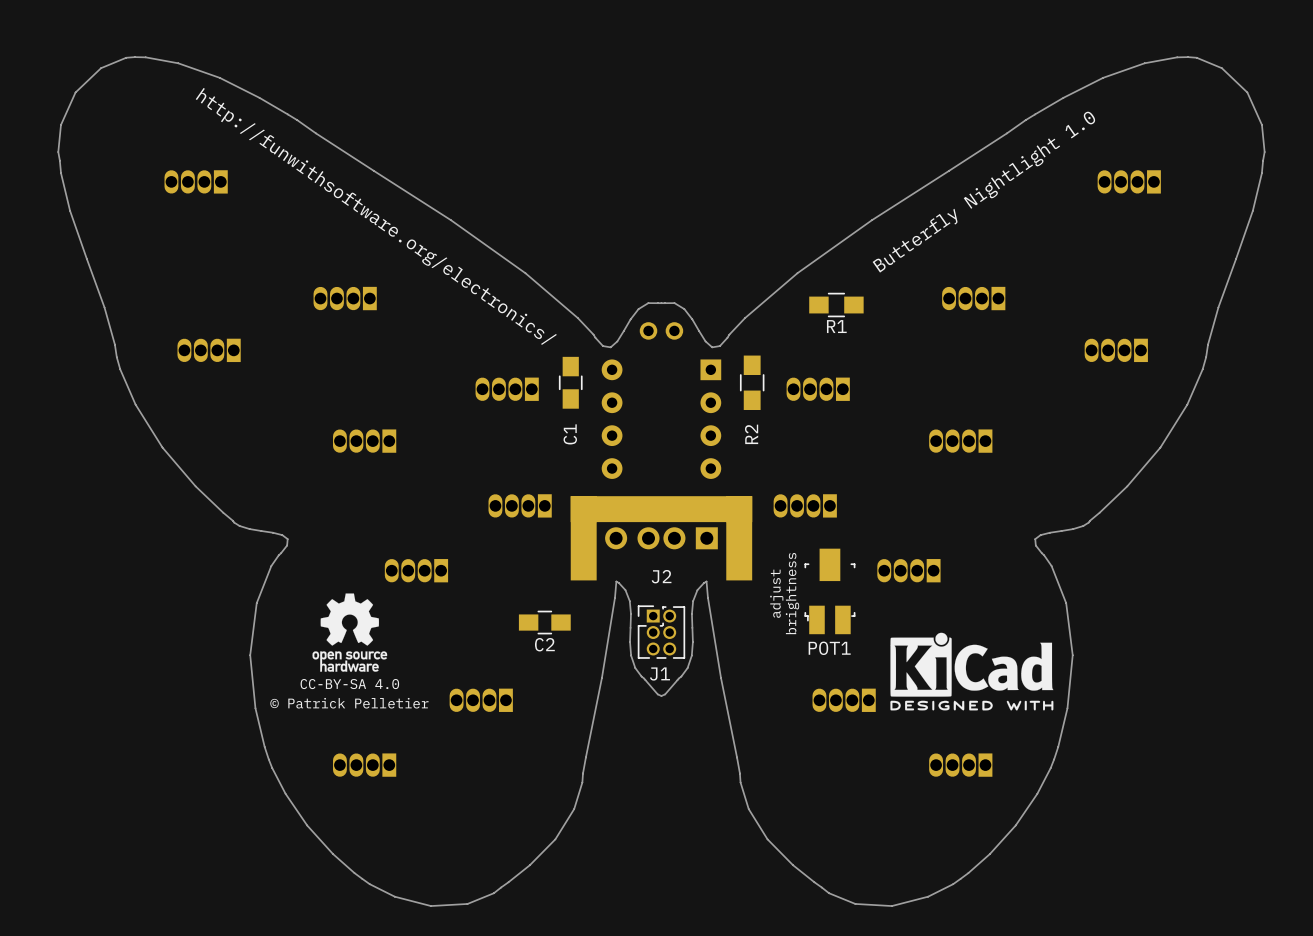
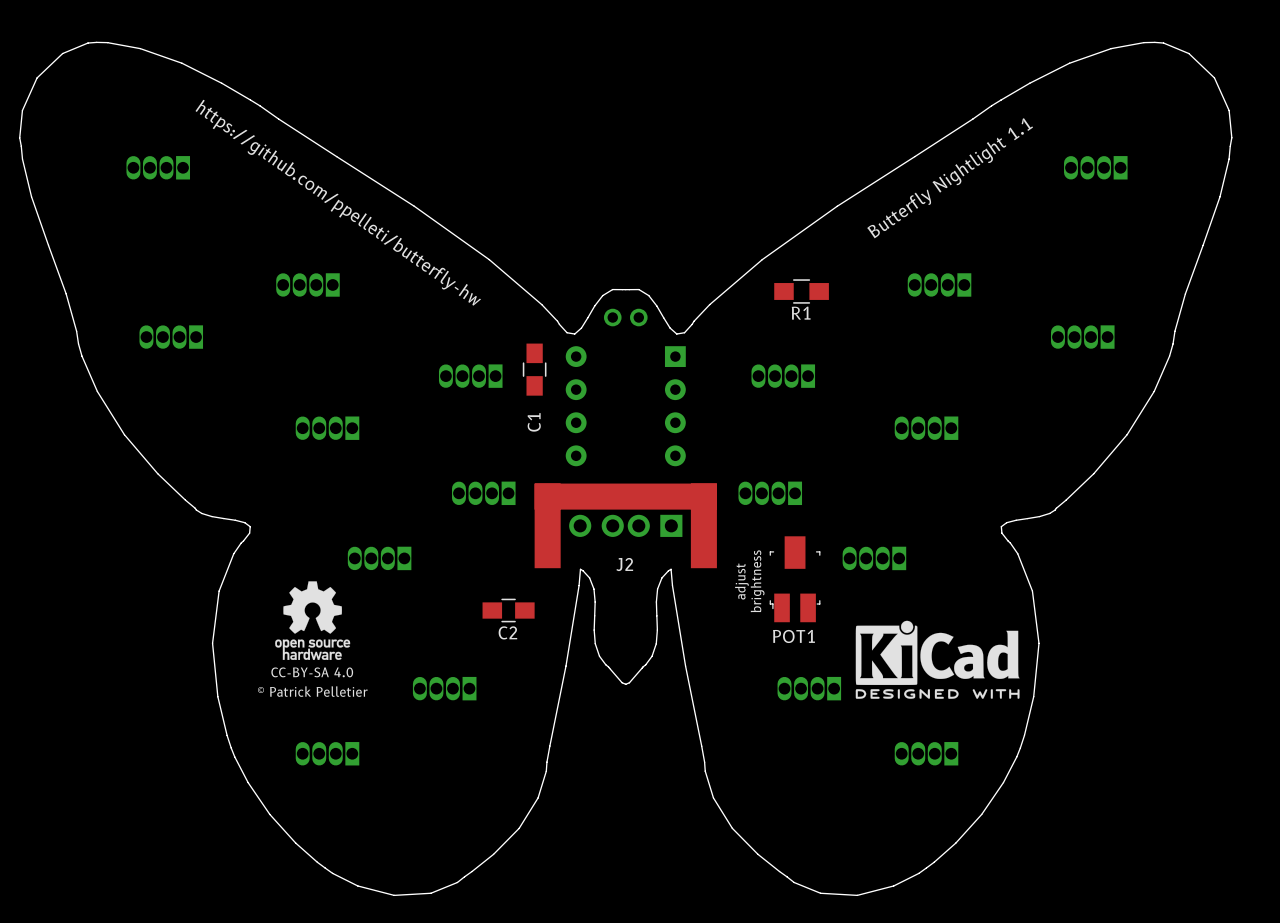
text: Butterfly Nightlight 1.0 (983, 192) -> Butterfly Nightlight 1.1 (950, 178)
text: http://funwithsoftware.org/electronics/ (376, 216) -> https://github.com/ppelleti/butterfly-hw (338, 202)
R2: (752, 382) -> none
J1: (661, 632) -> none

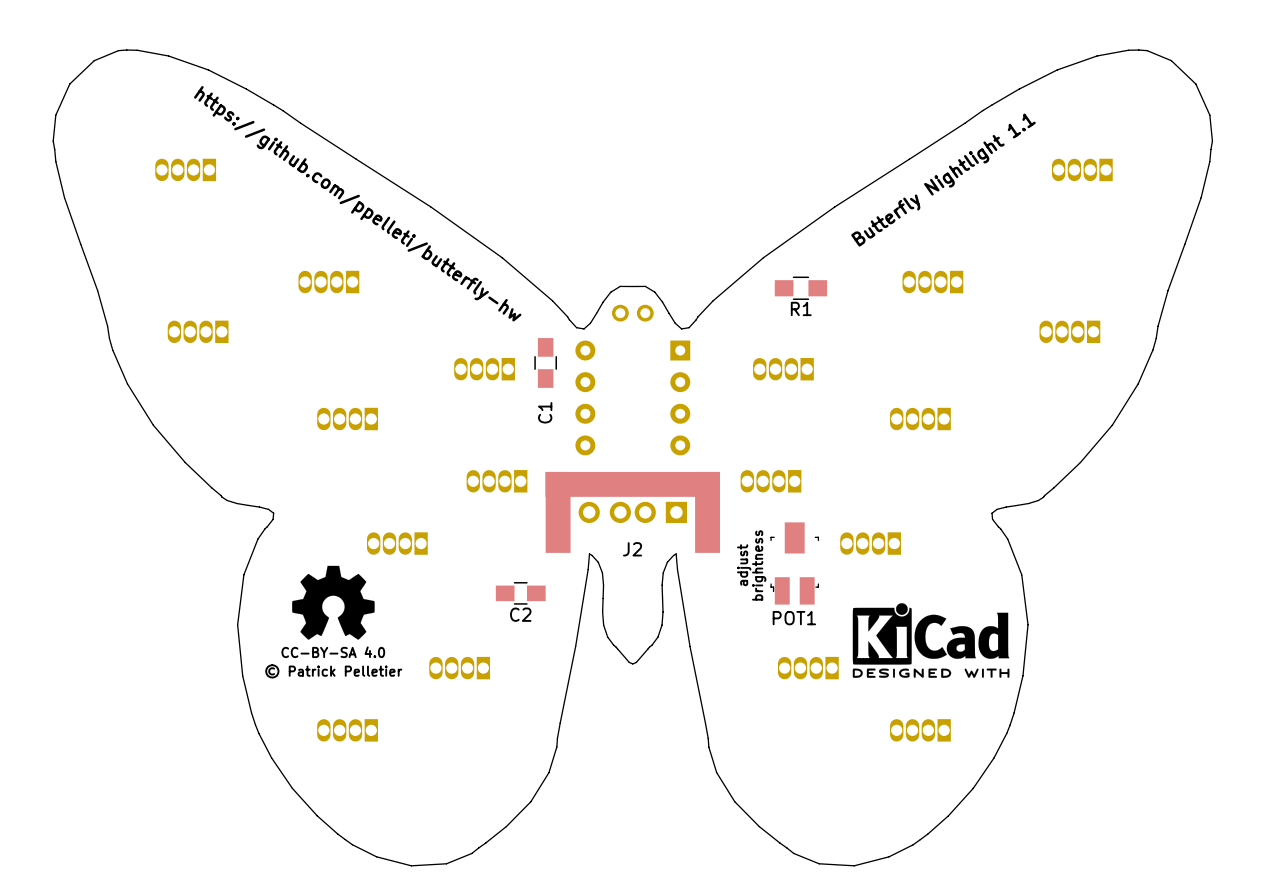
drawing shape: [275, 581, 351, 660] -> [292, 565, 375, 640]

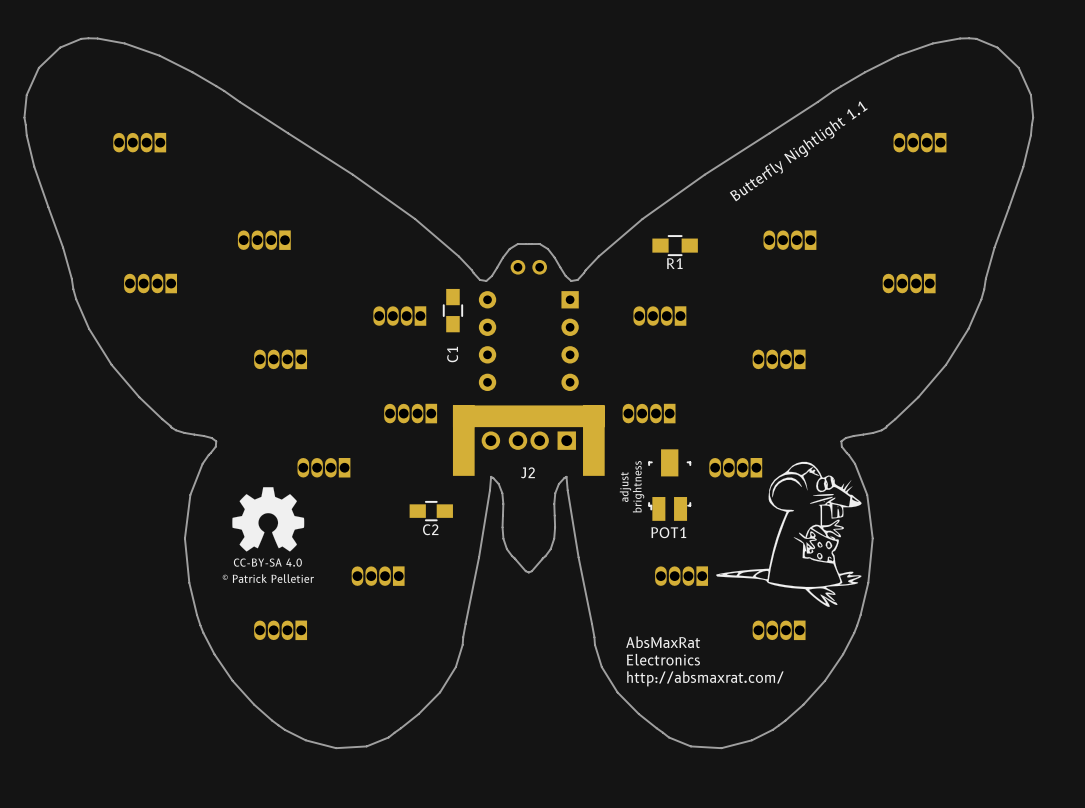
text: https://github.com/ppelleti/butterfly-hw (357, 203) -> none
drawing: none -> [716, 461, 862, 608]
drawing: [852, 603, 1010, 678] -> none
text: none -> AbsMaxRat (663, 642)
text: none -> Electronics (663, 659)
text: none -> http://absmaxrat.com/ (705, 678)

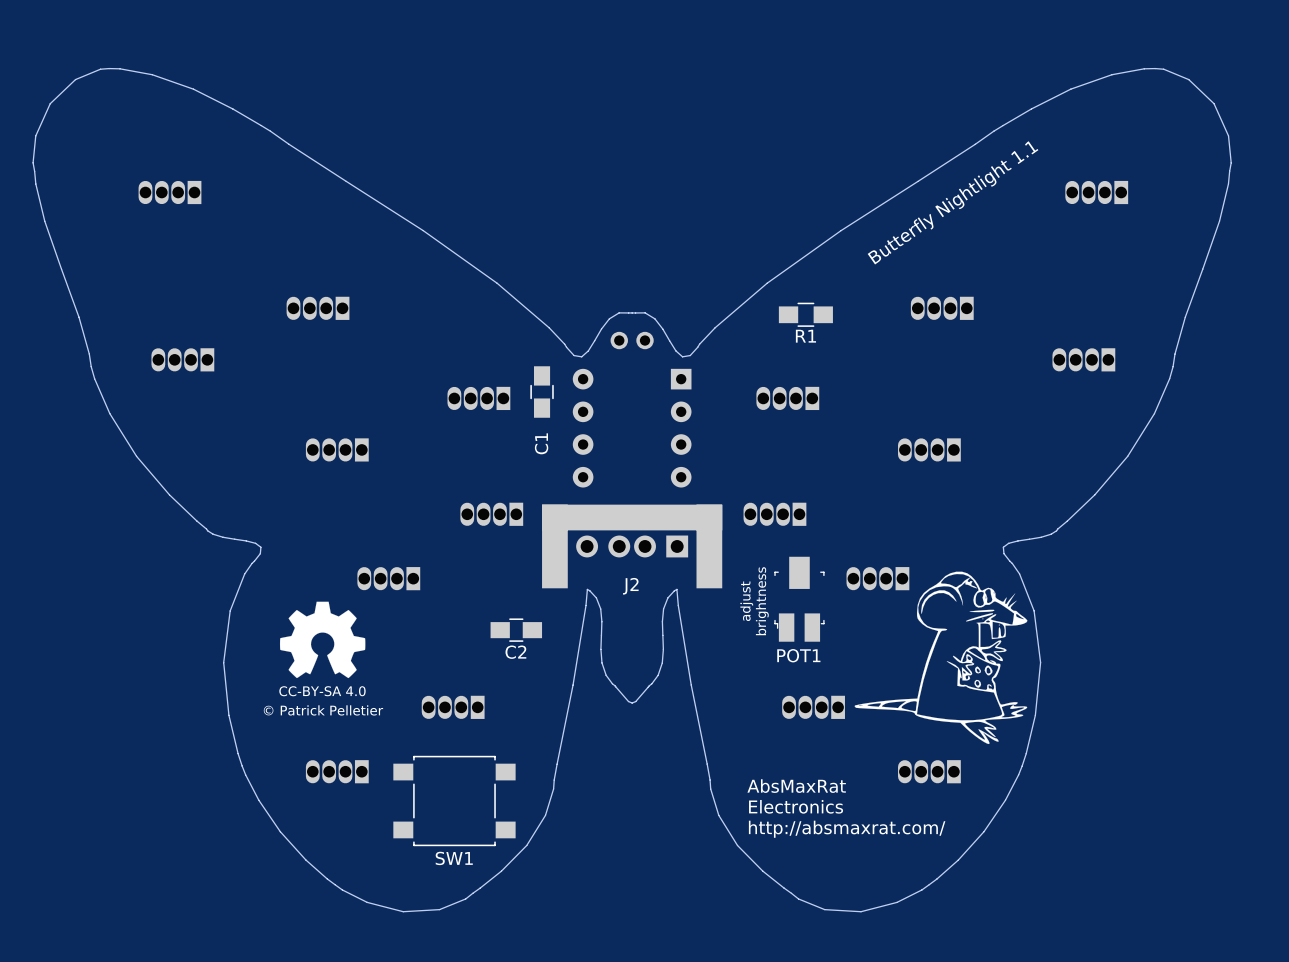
SW1: none -> (454, 800)

